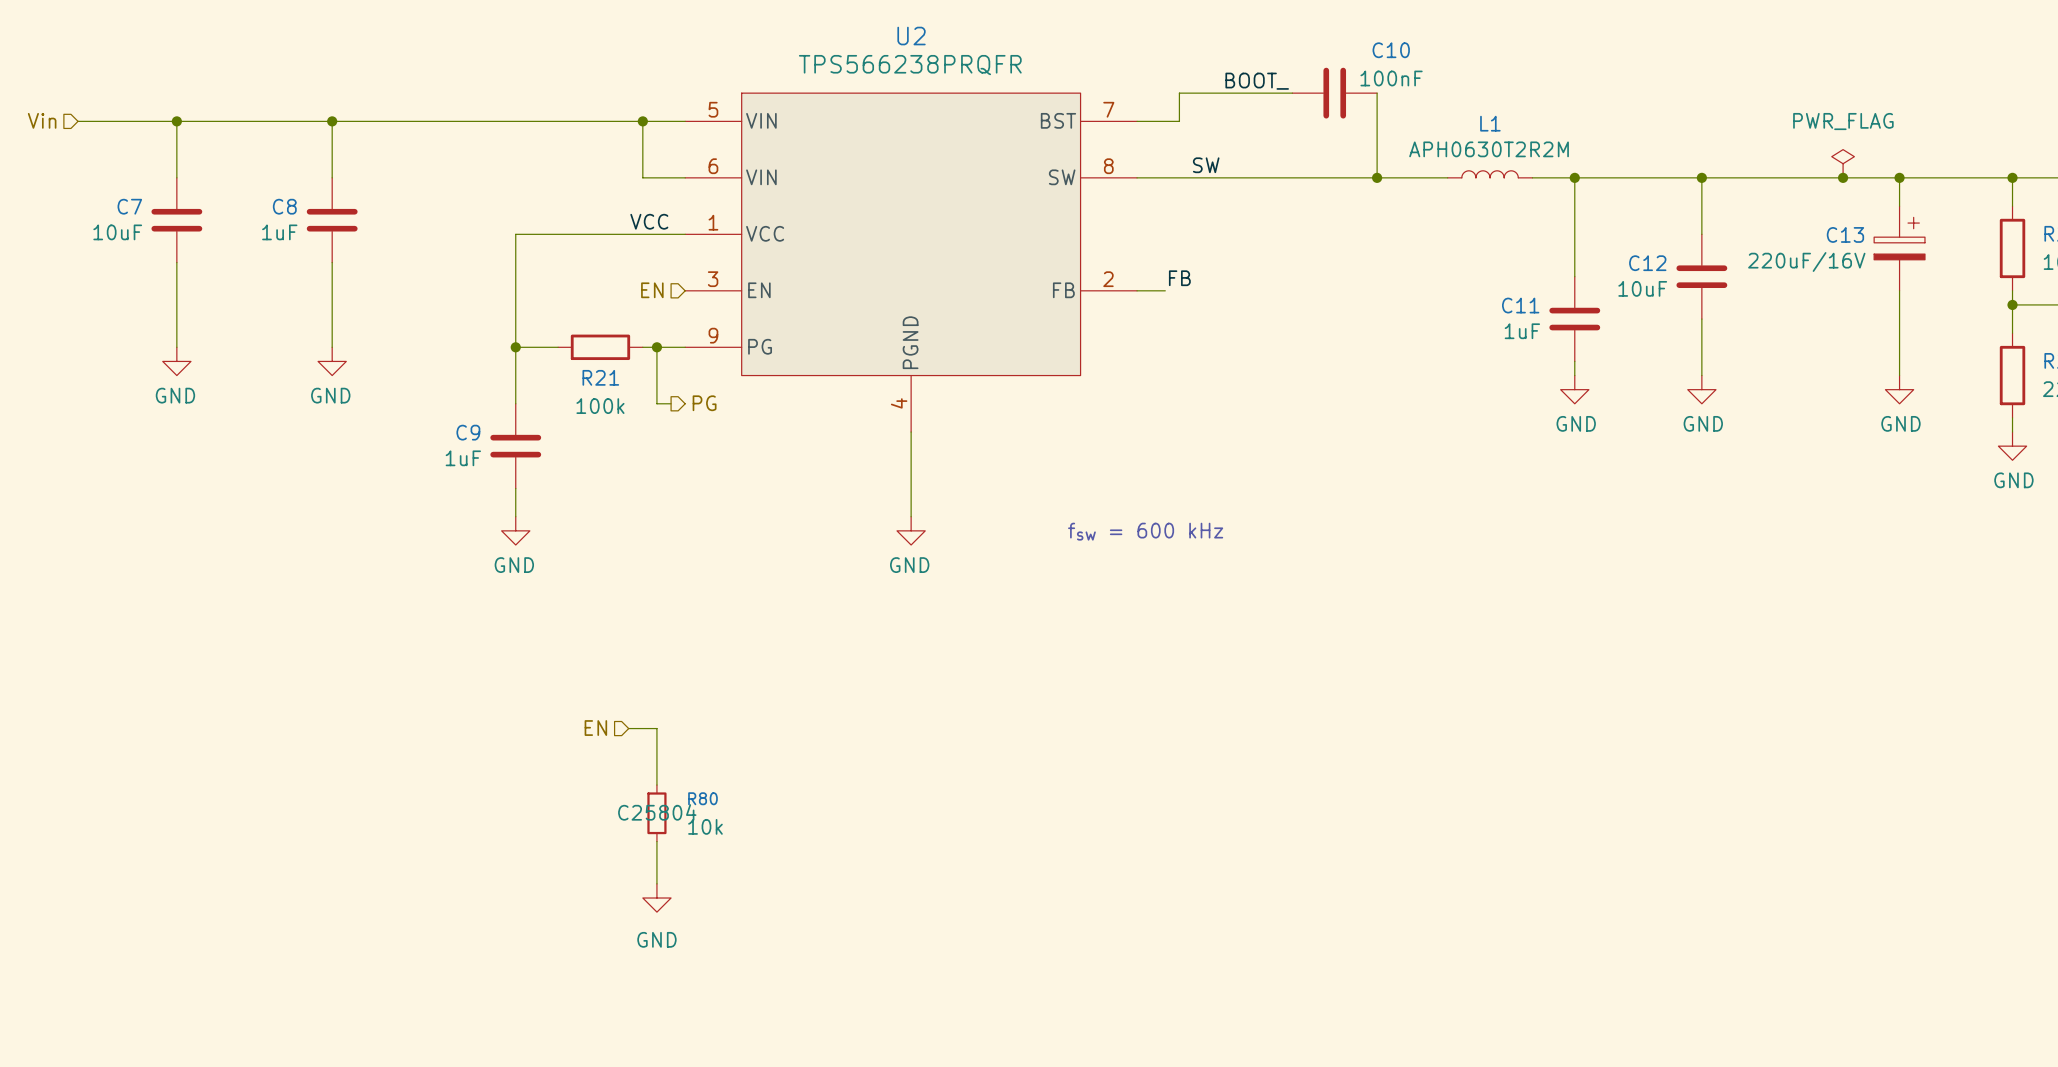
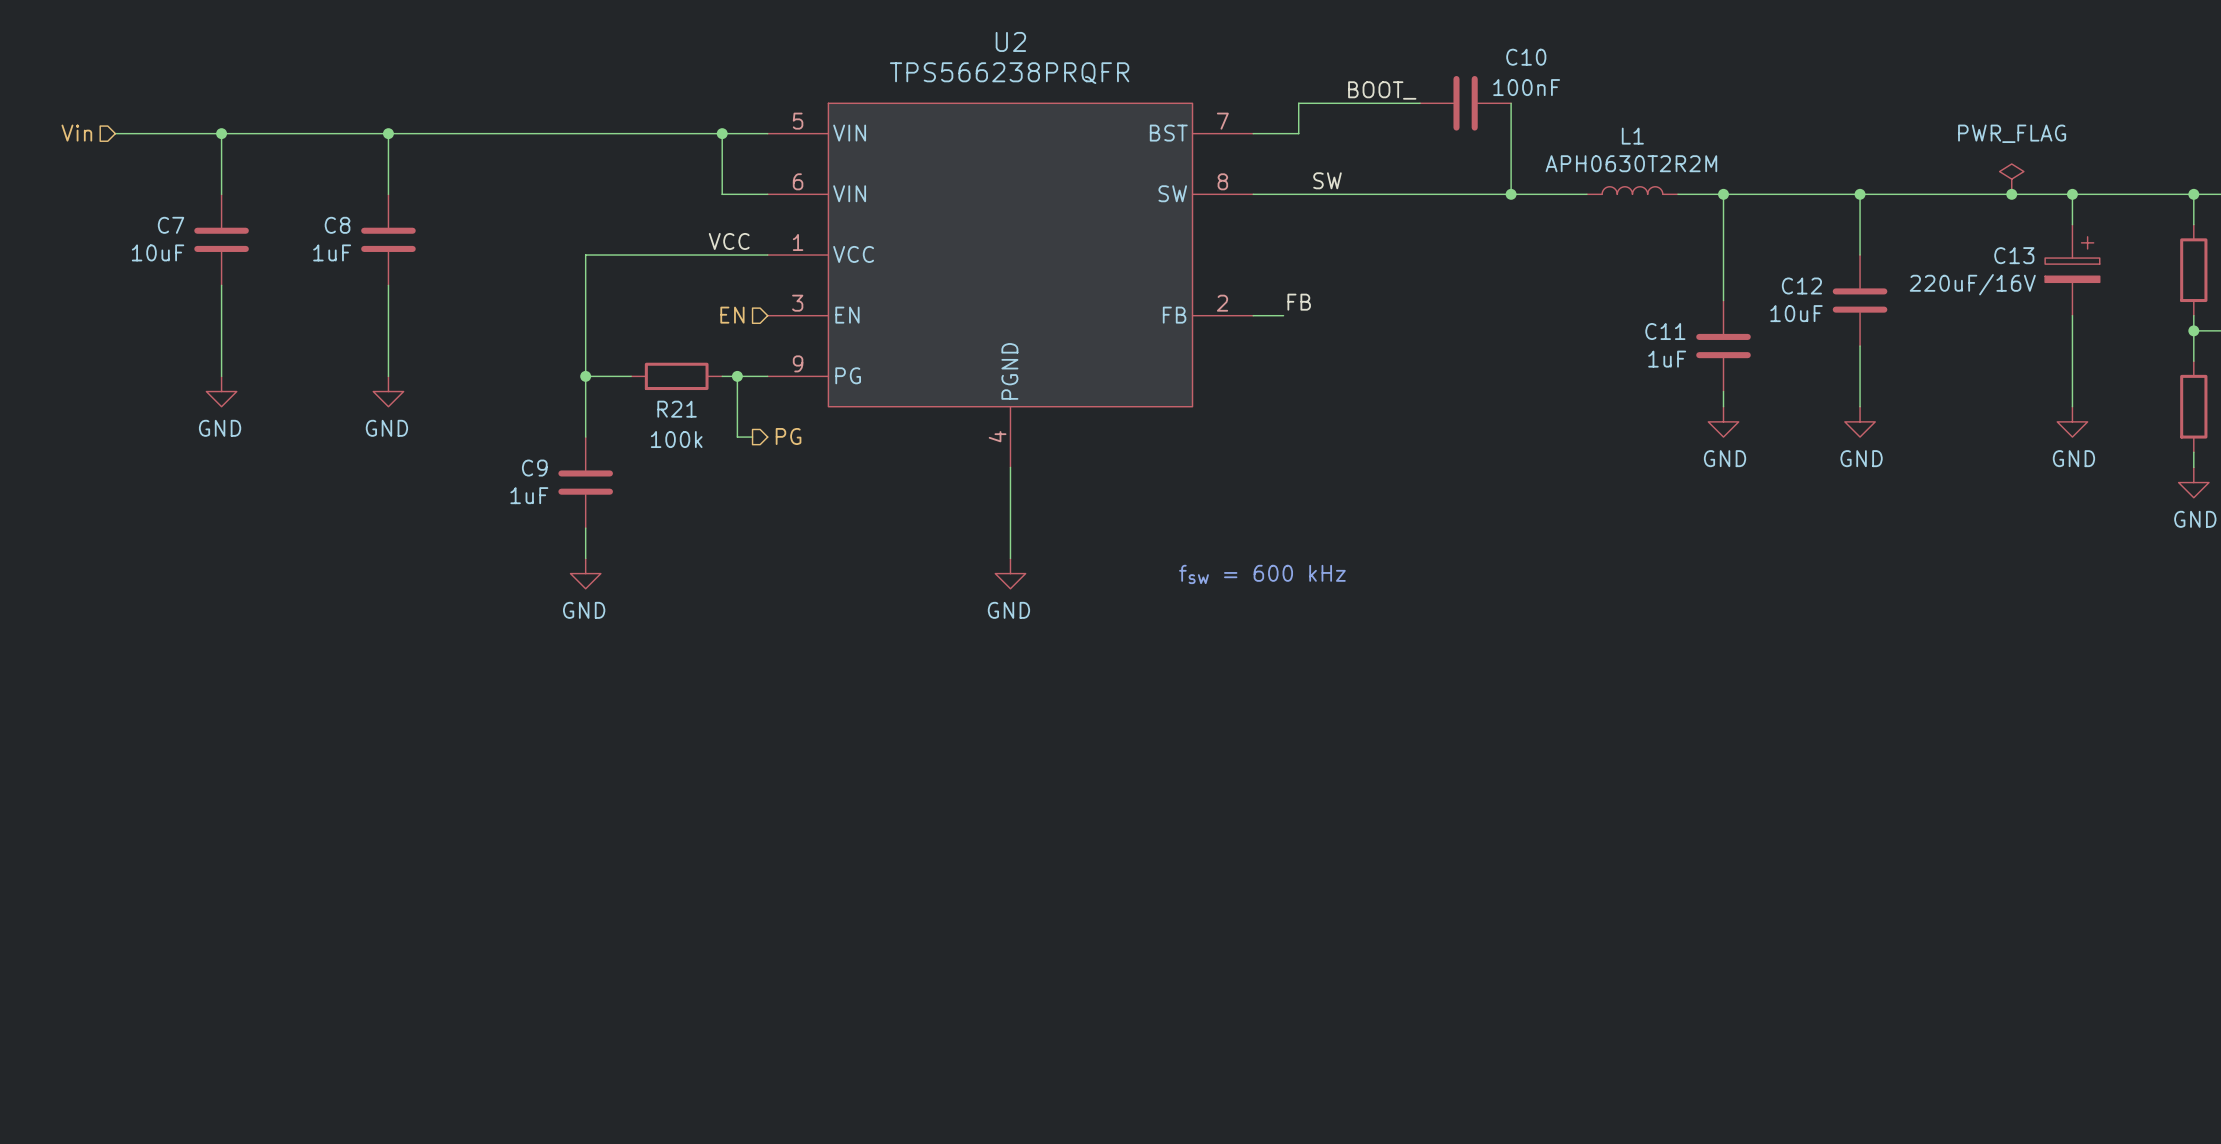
hierarchical label: EN (595, 728) -> none
wire: (628, 728) (656, 728) (656, 785) -> none
R80: 10k (656, 813) -> none
wire: (656, 841) (656, 883) -> none
power symbol: GND (656, 898) -> none

